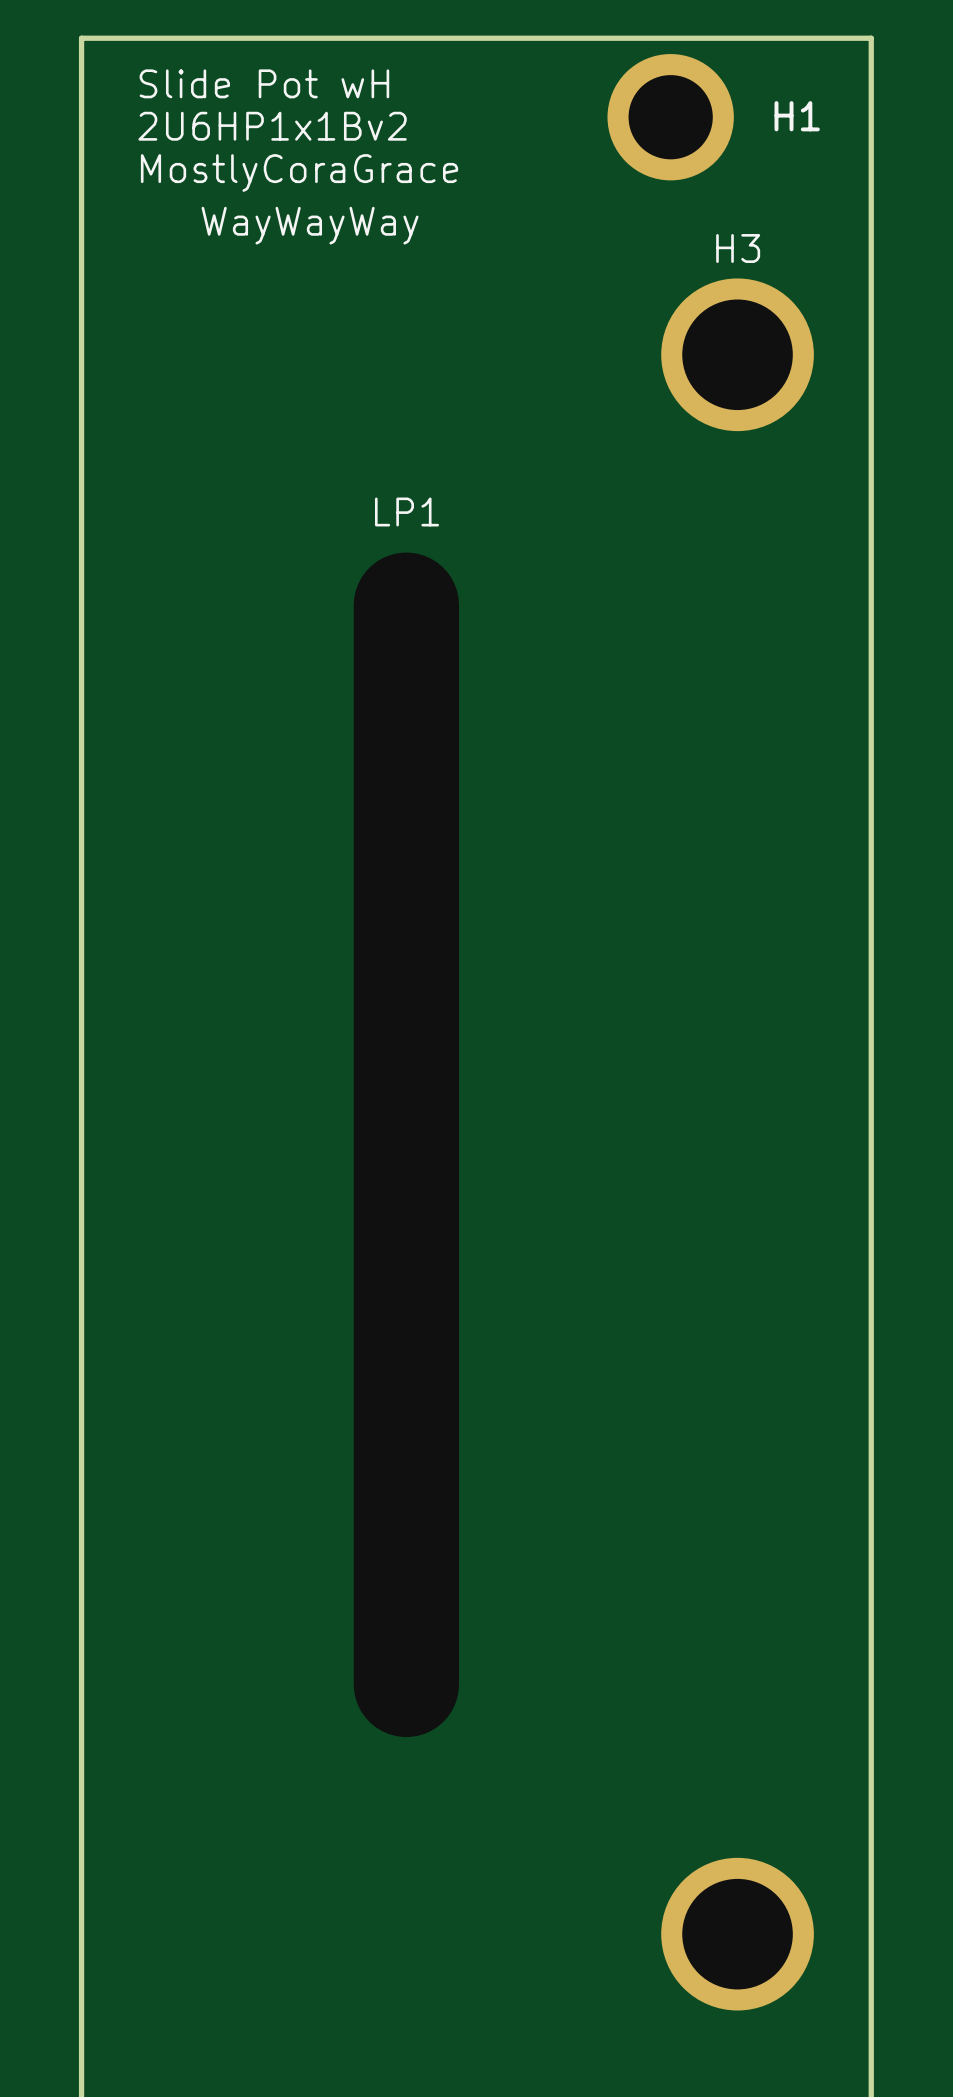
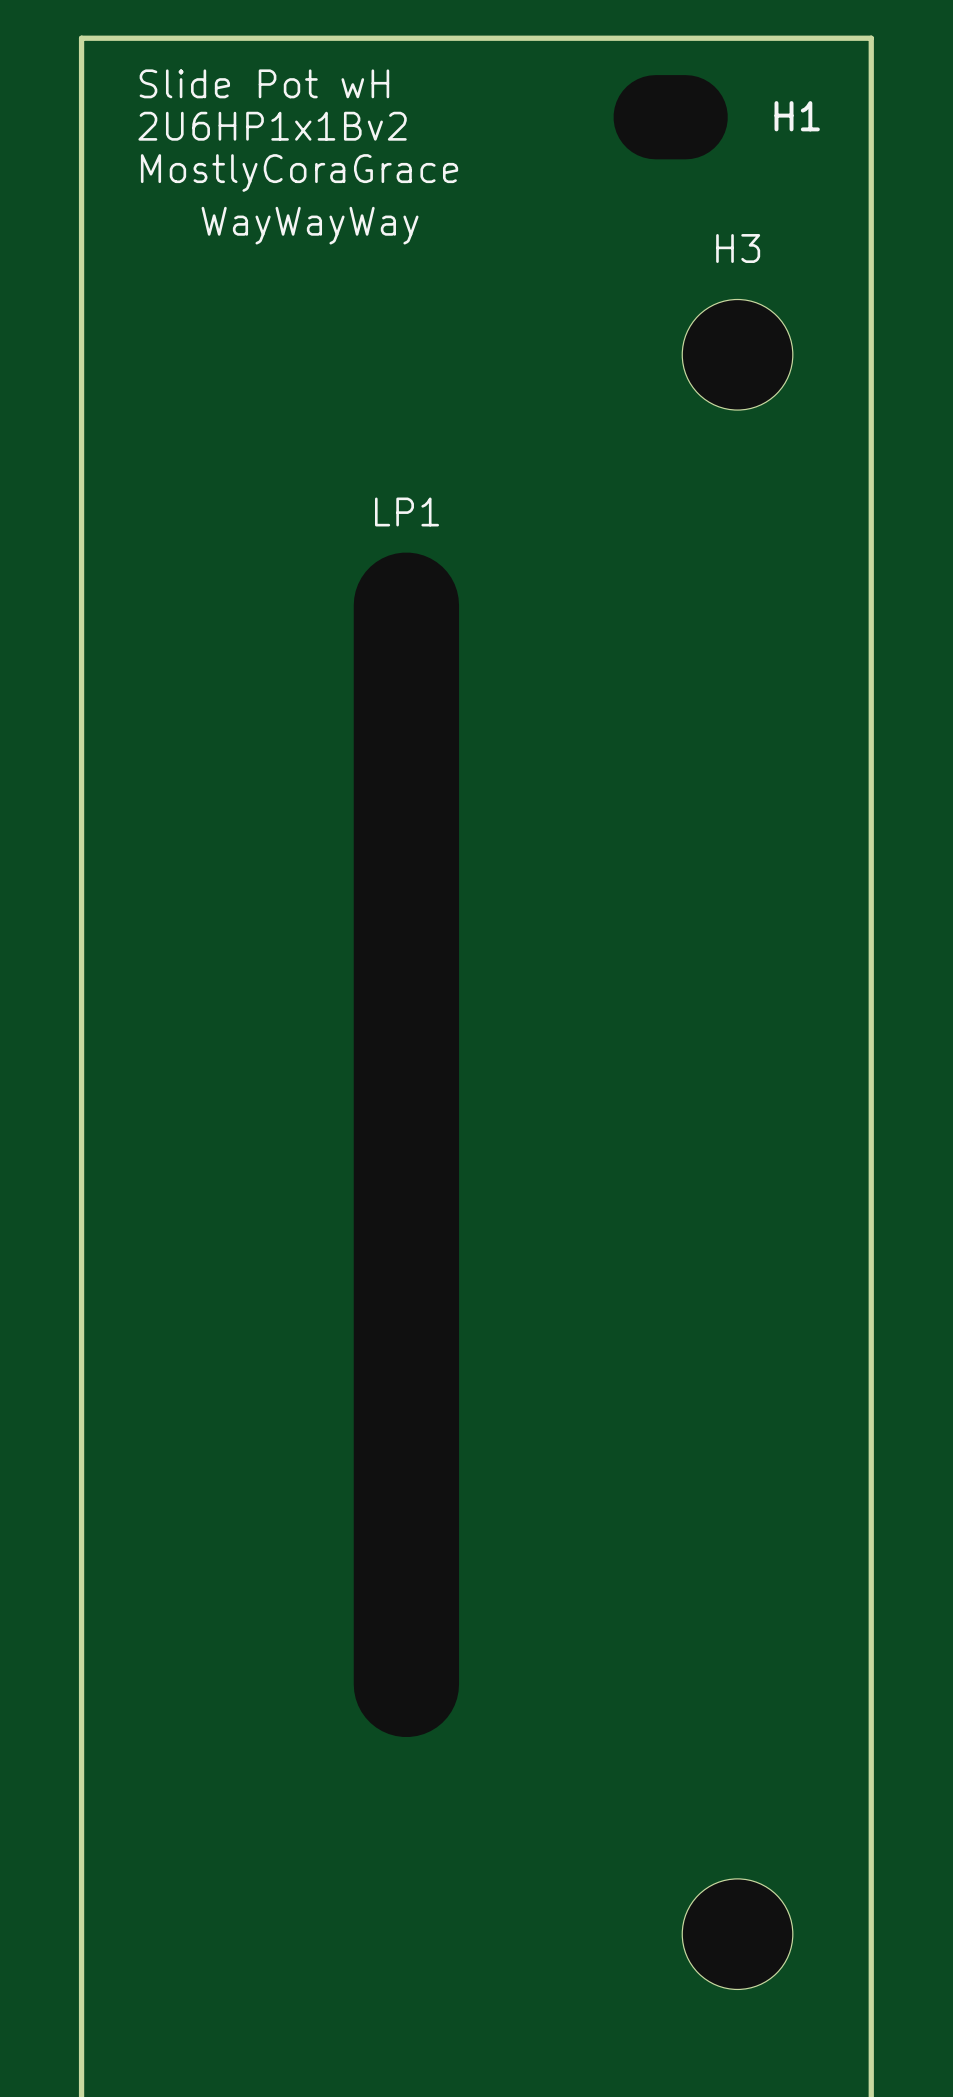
H1 footprint: [607, 54, 734, 181] -> [613, 75, 728, 160]
H3 footprint: [661, 278, 814, 2011] -> [682, 299, 793, 1990]

